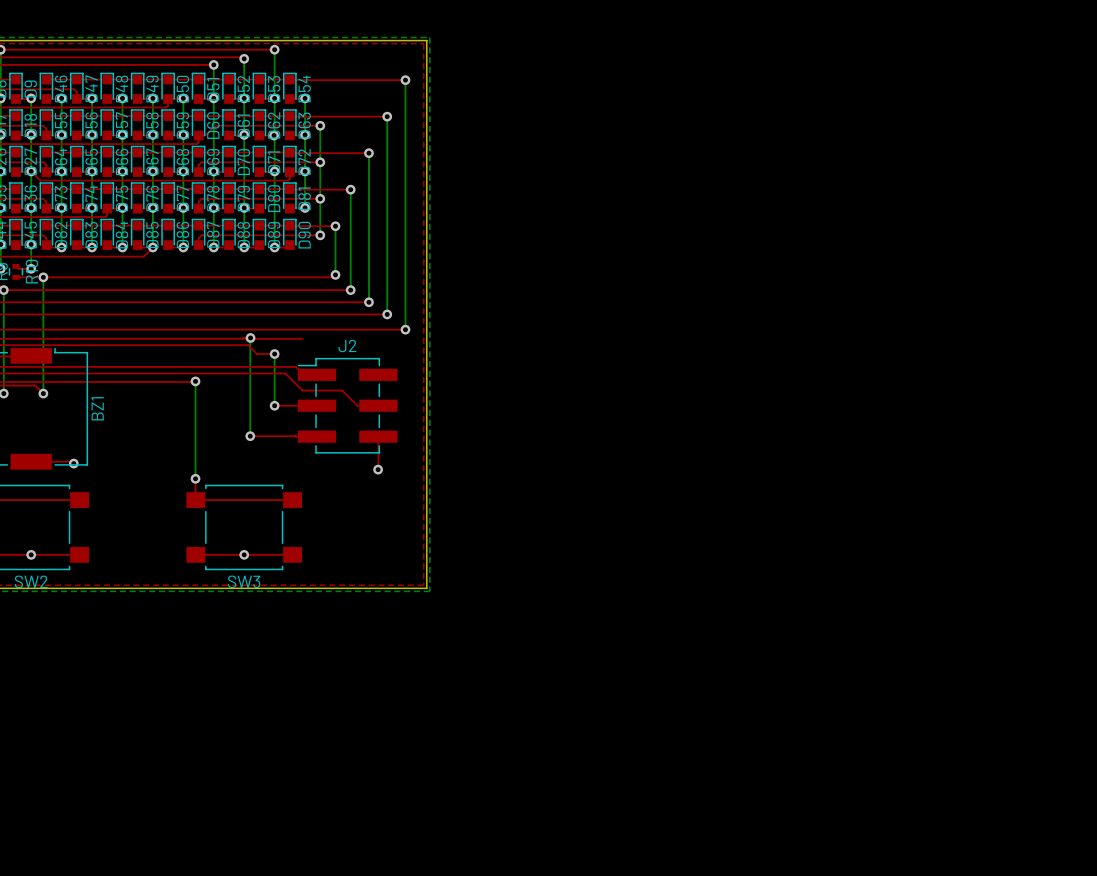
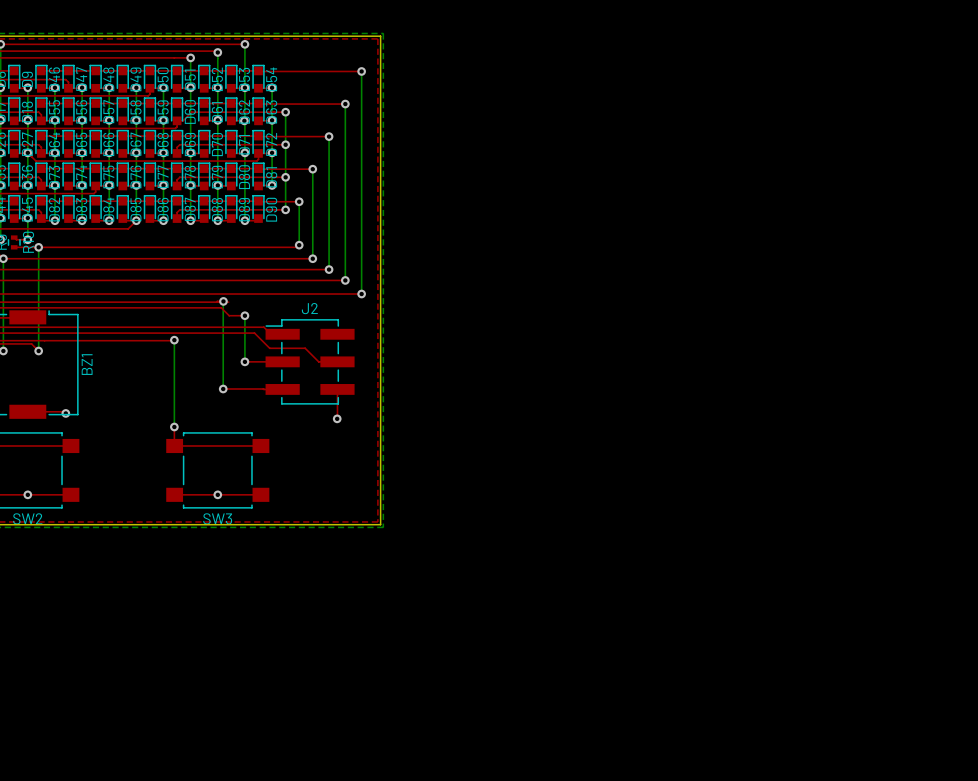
top track: (256, 338) (302, 338) -> none

